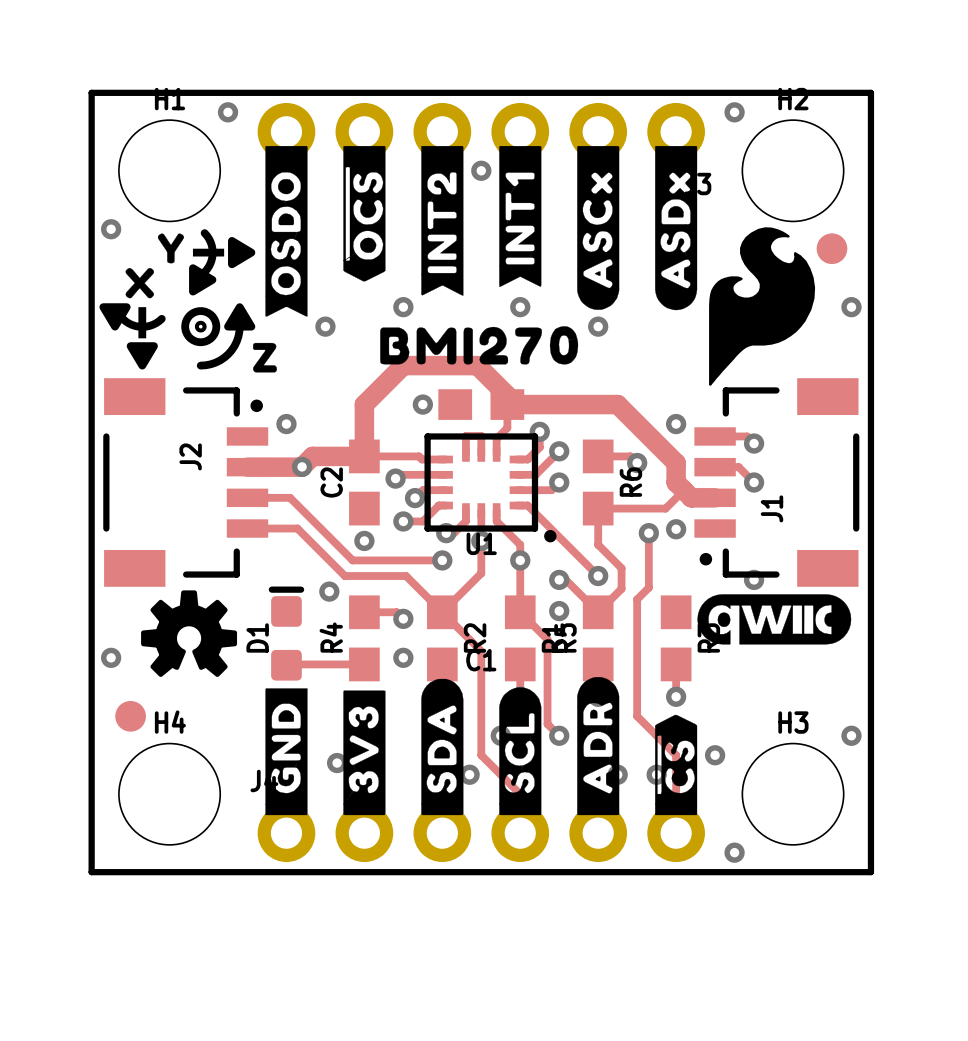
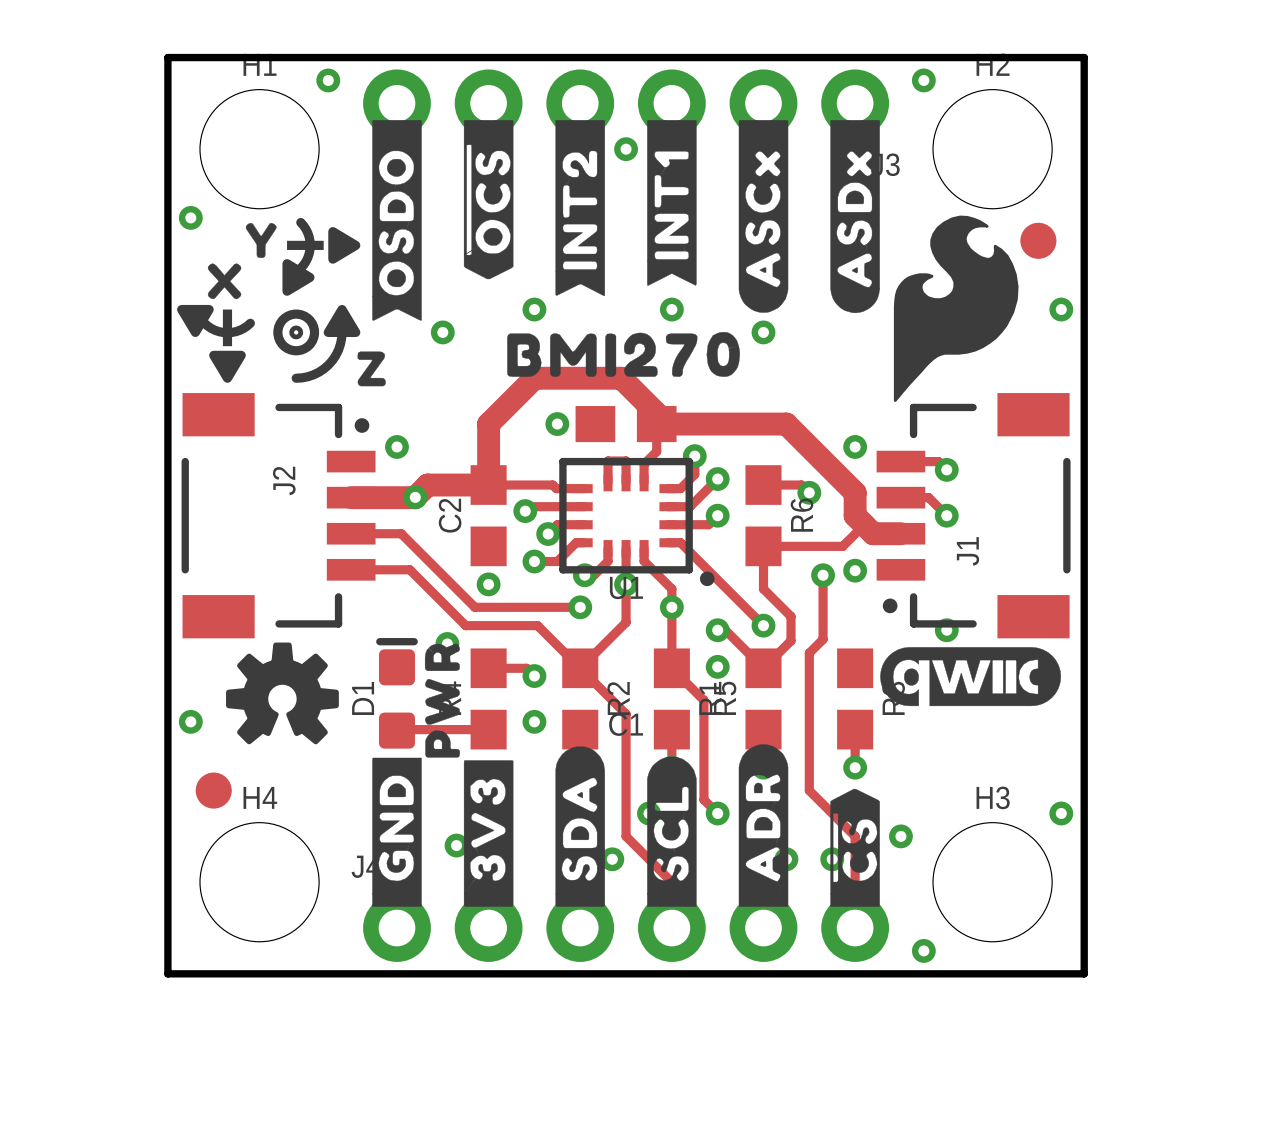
drawing: none -> [424, 643, 460, 758]

